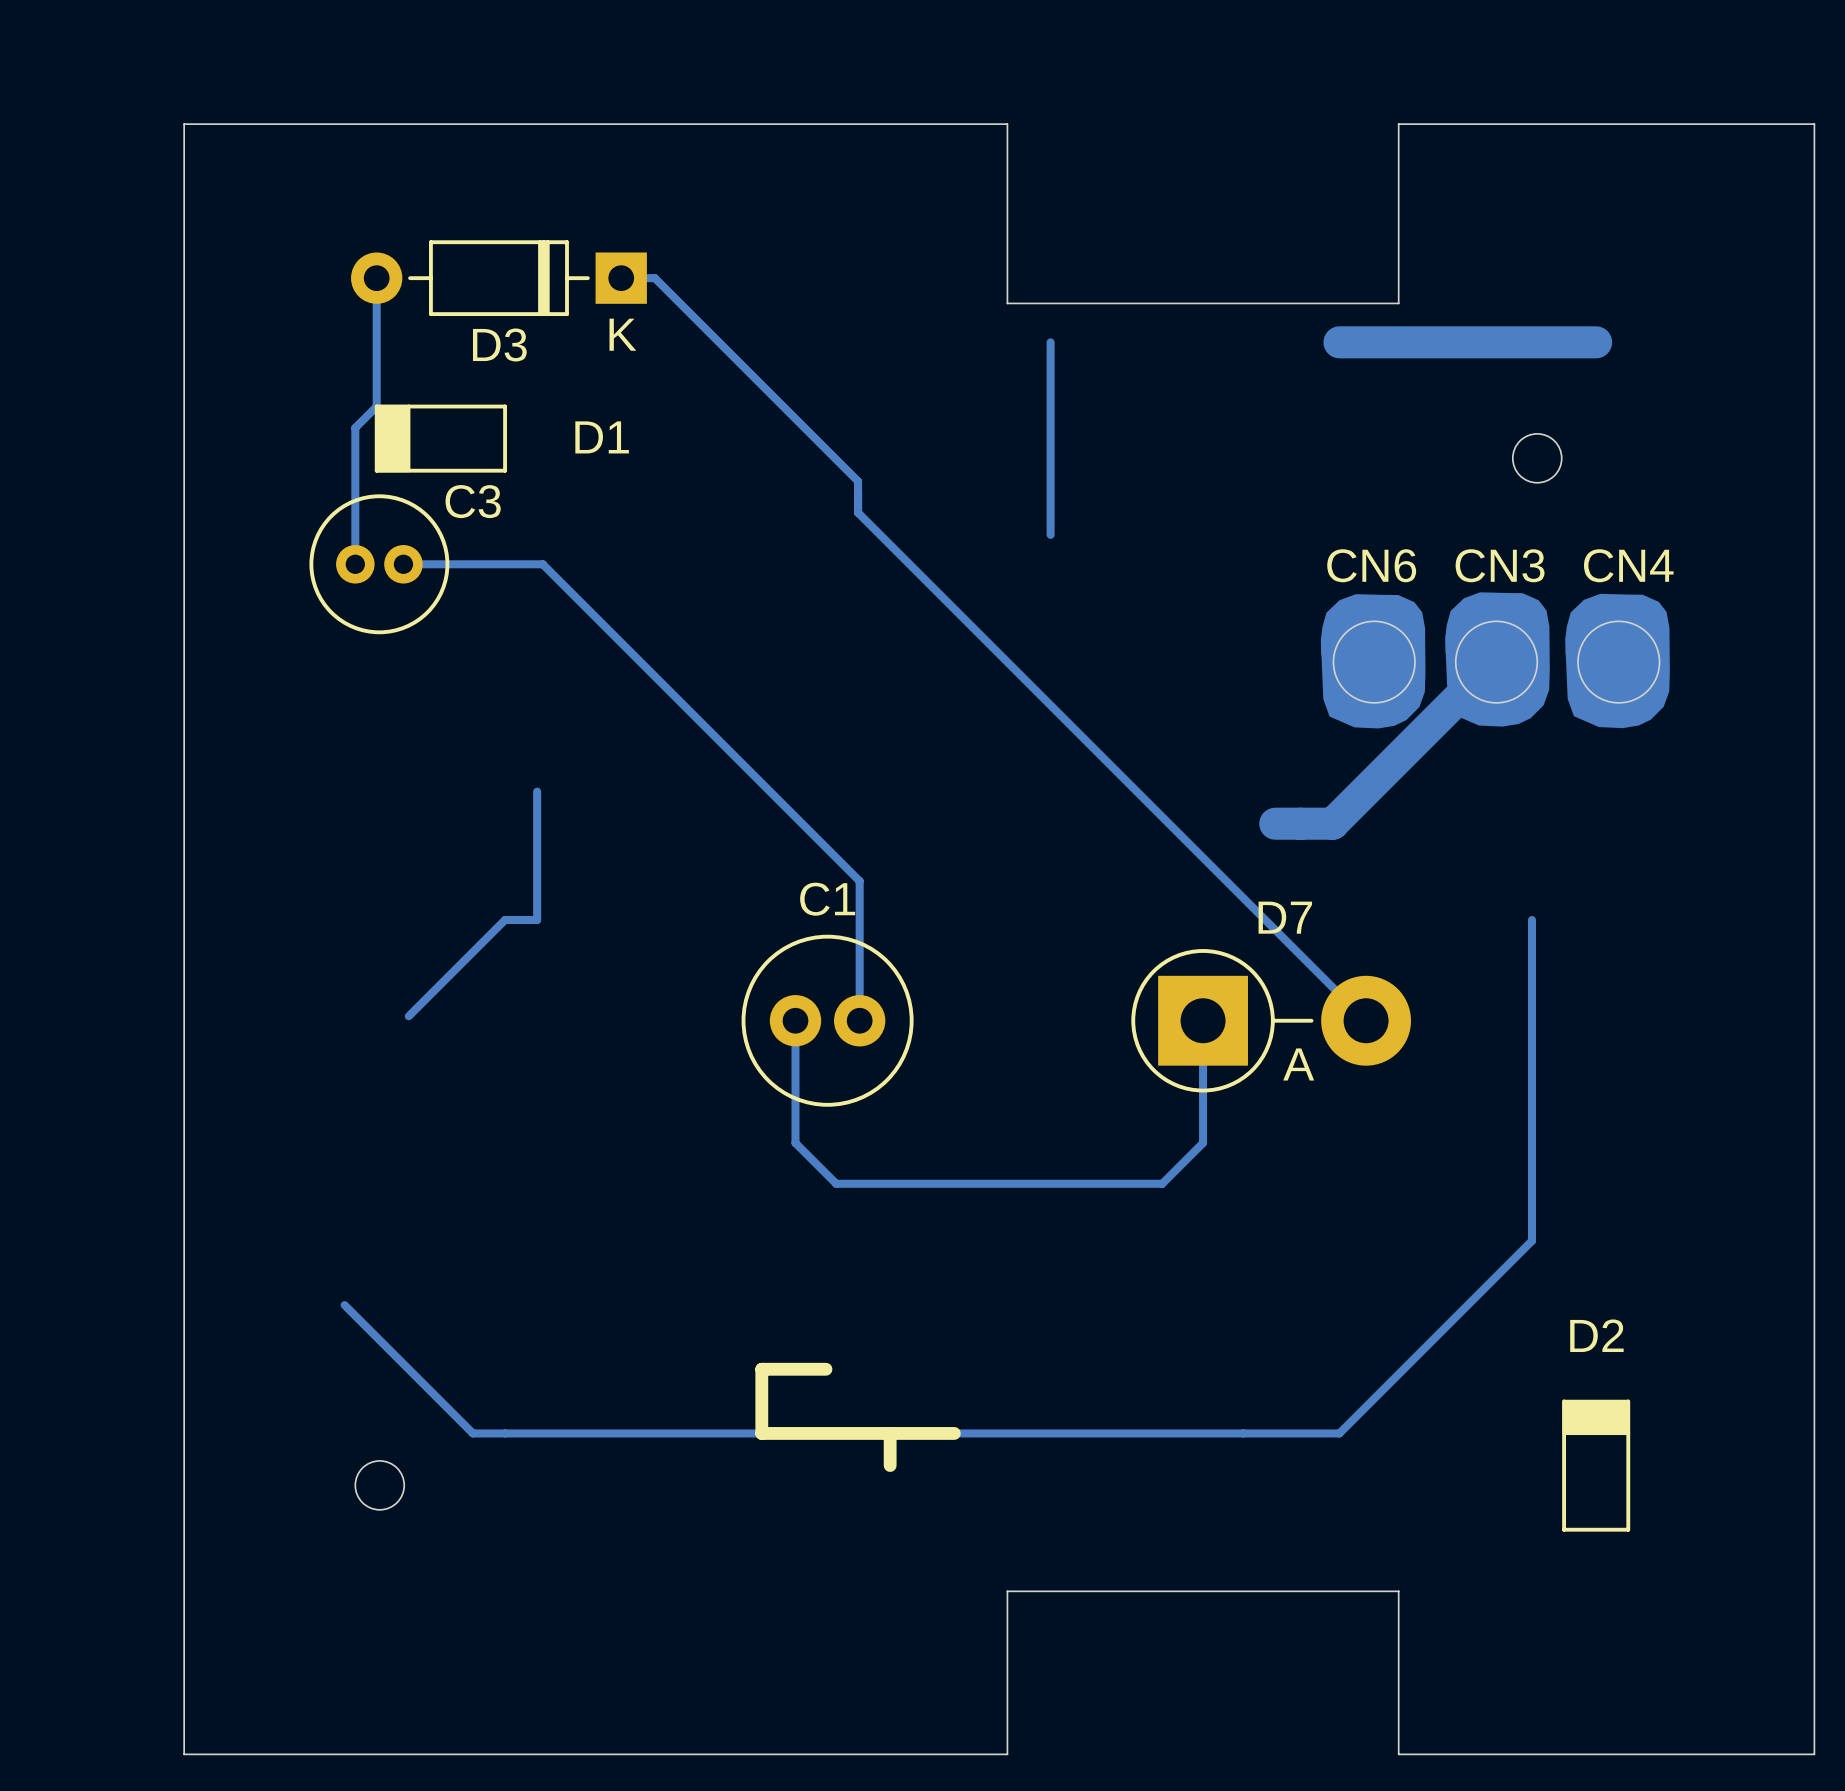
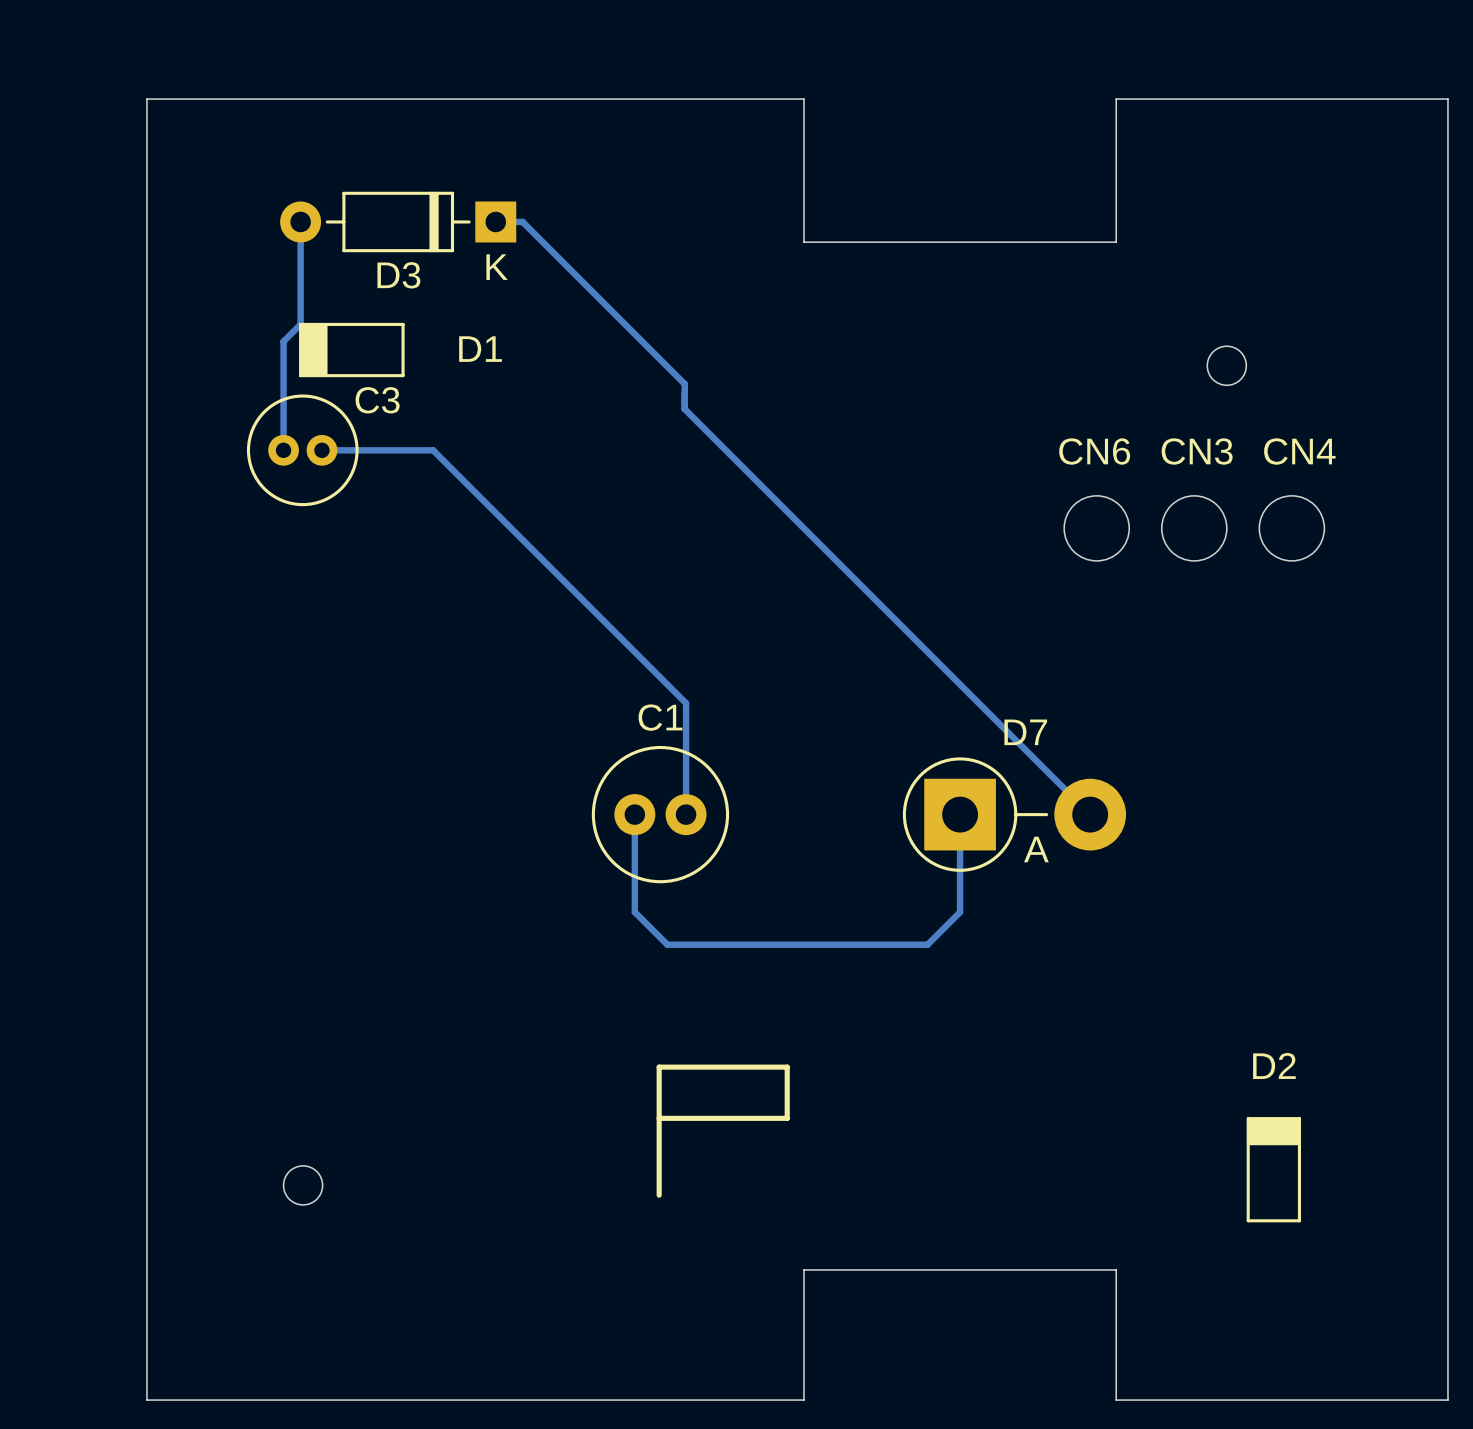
bottom track: (1050, 342) (1050, 534) -> none
bottom track: (1339, 342) (1596, 342) -> none
drawing: [1320, 592, 1670, 729] -> none
bottom track: (1458, 697) (1332, 823) (1275, 823) -> none
bottom track: (537, 791) (537, 919) (505, 919) (408, 1016) -> none
bottom track: (1531, 919) (1531, 1240) (1339, 1433) (472, 1433) (344, 1305) -> none
line: (825, 1369) (761, 1369) (761, 1433) (954, 1433) -> none
line: none -> (659, 1118) (787, 1118) (787, 1067) (659, 1067) (659, 1195)
line: (890, 1433) (890, 1465) -> none

